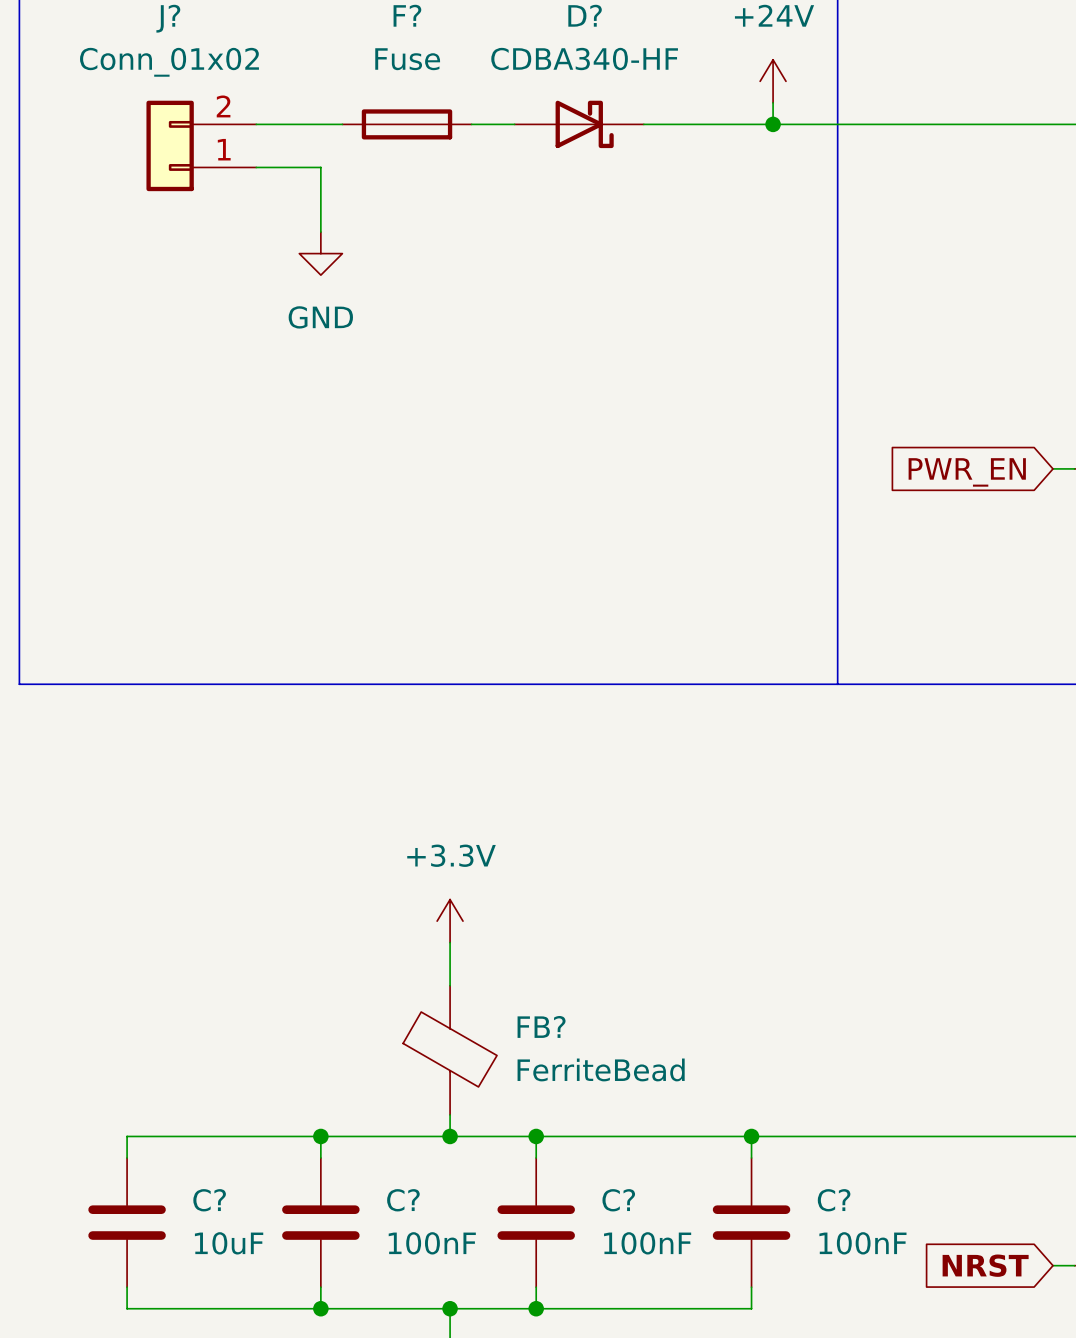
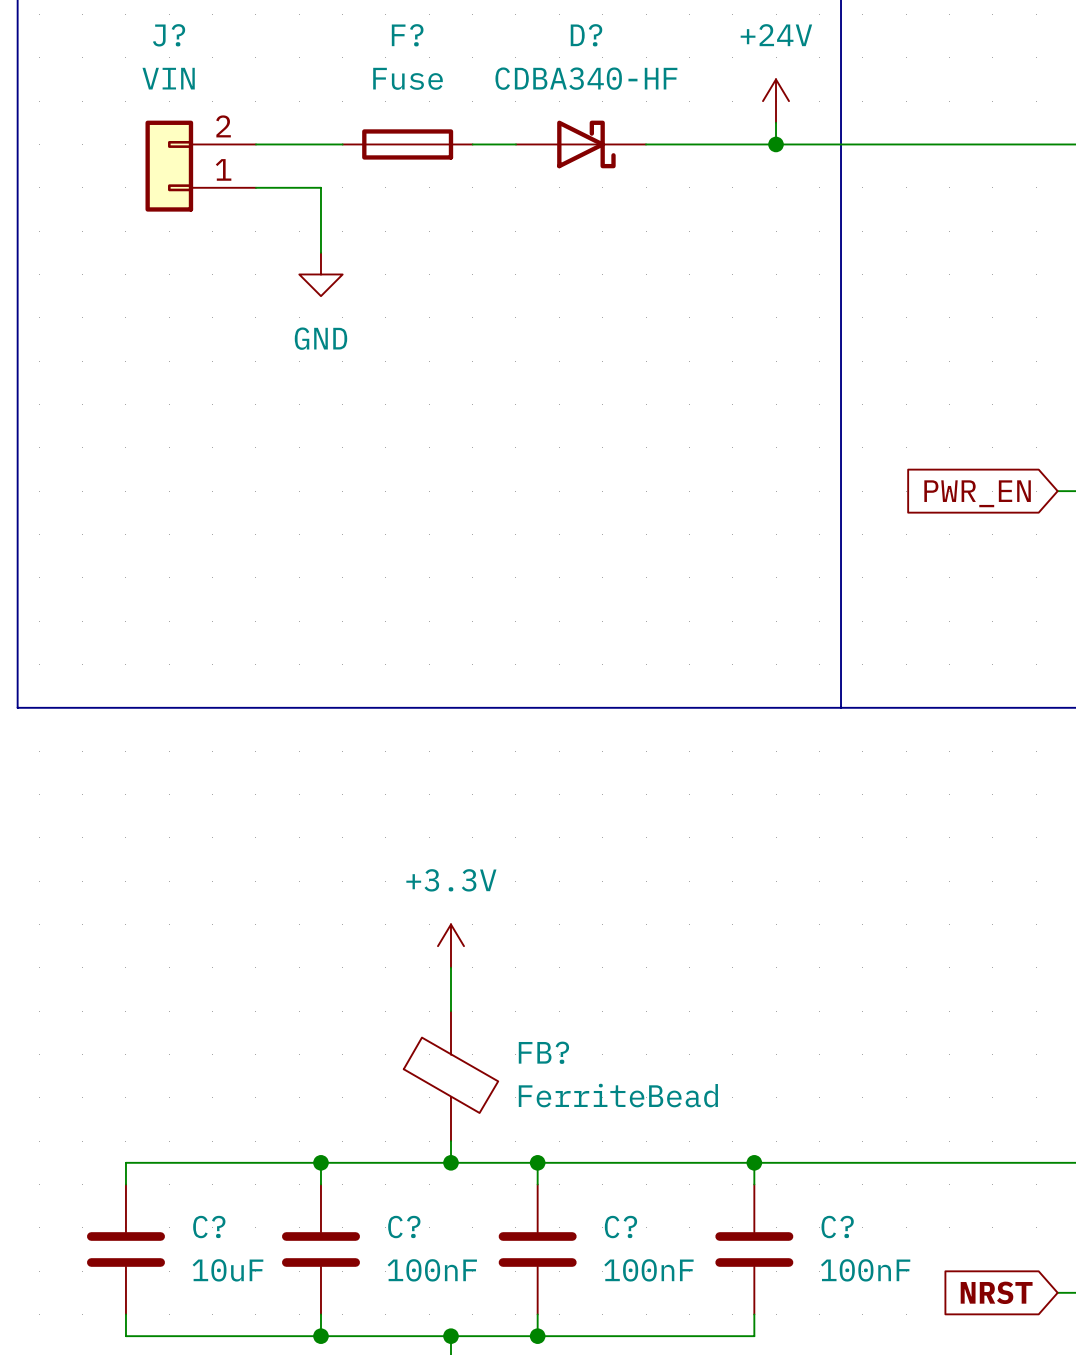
J? value: Conn_01x02 (169, 62) -> VIN (168, 78)

